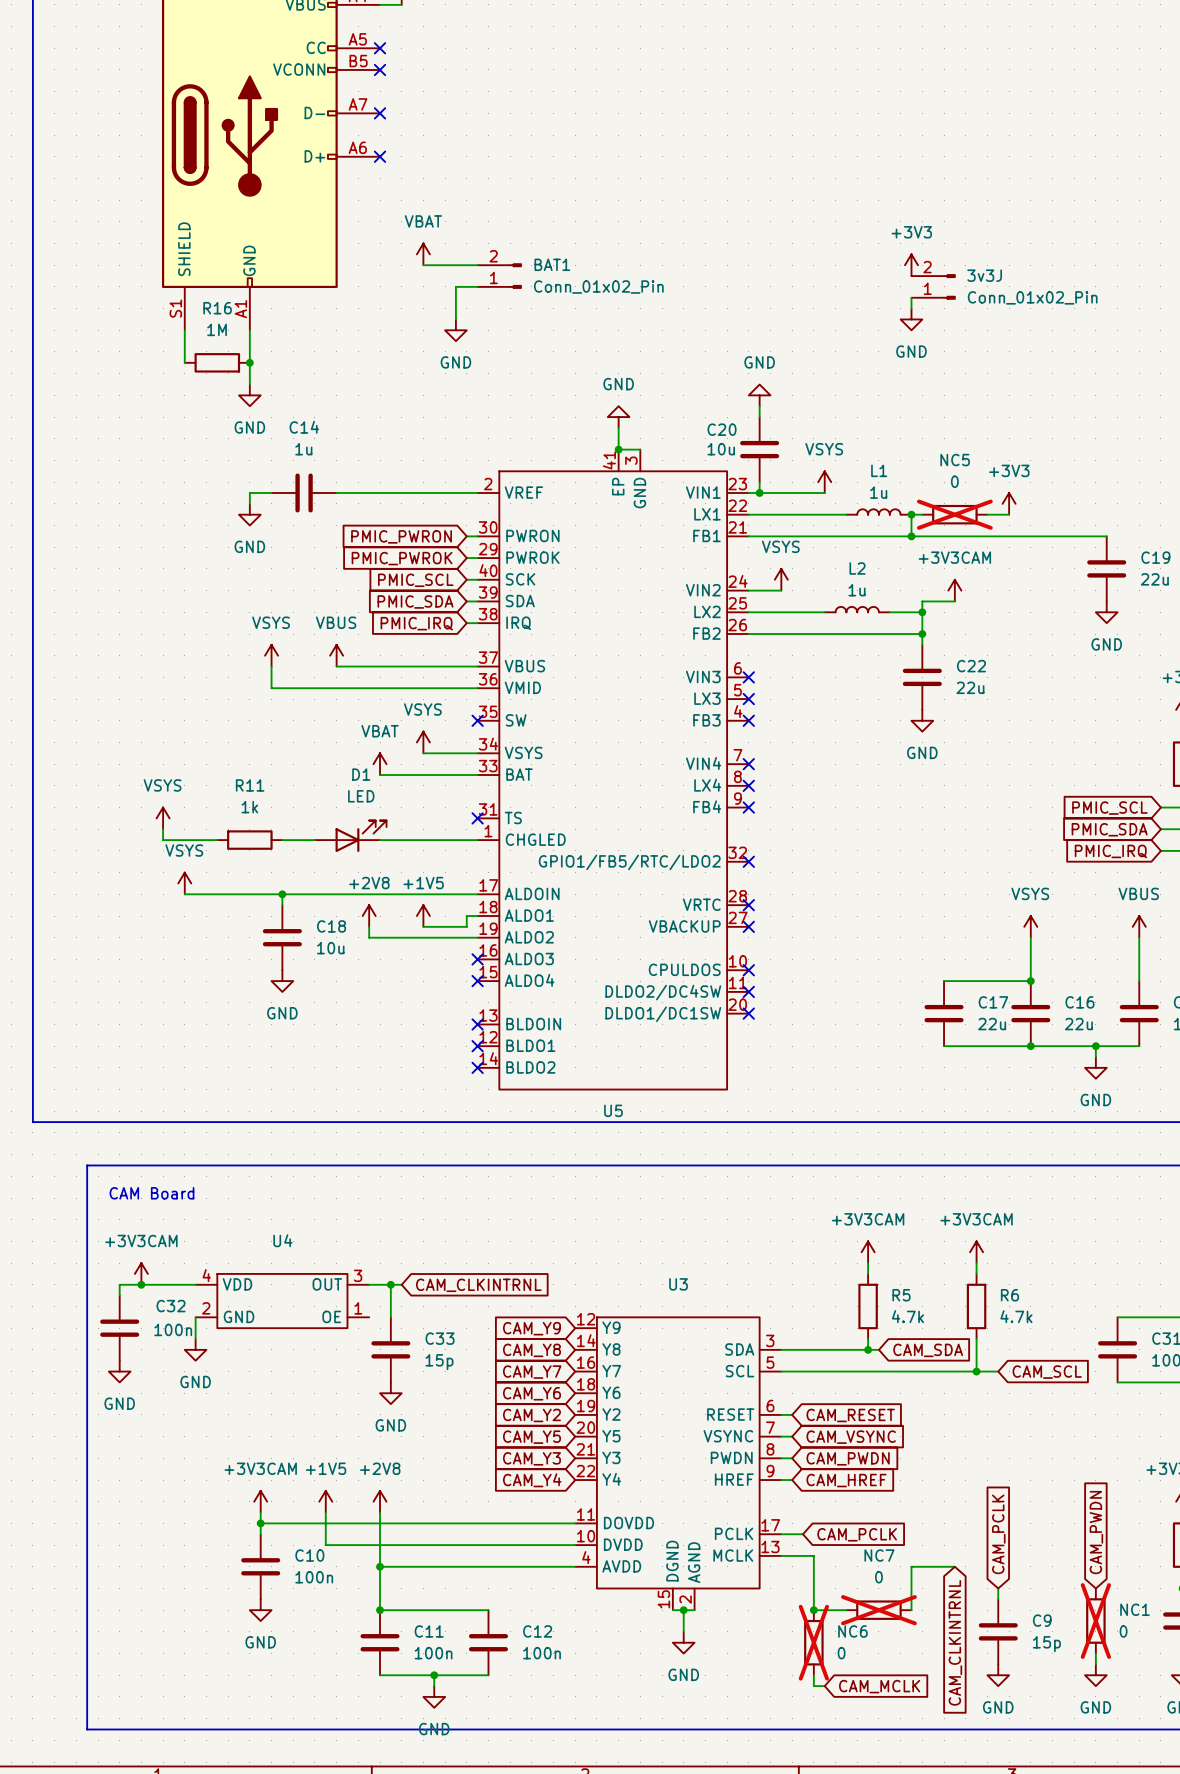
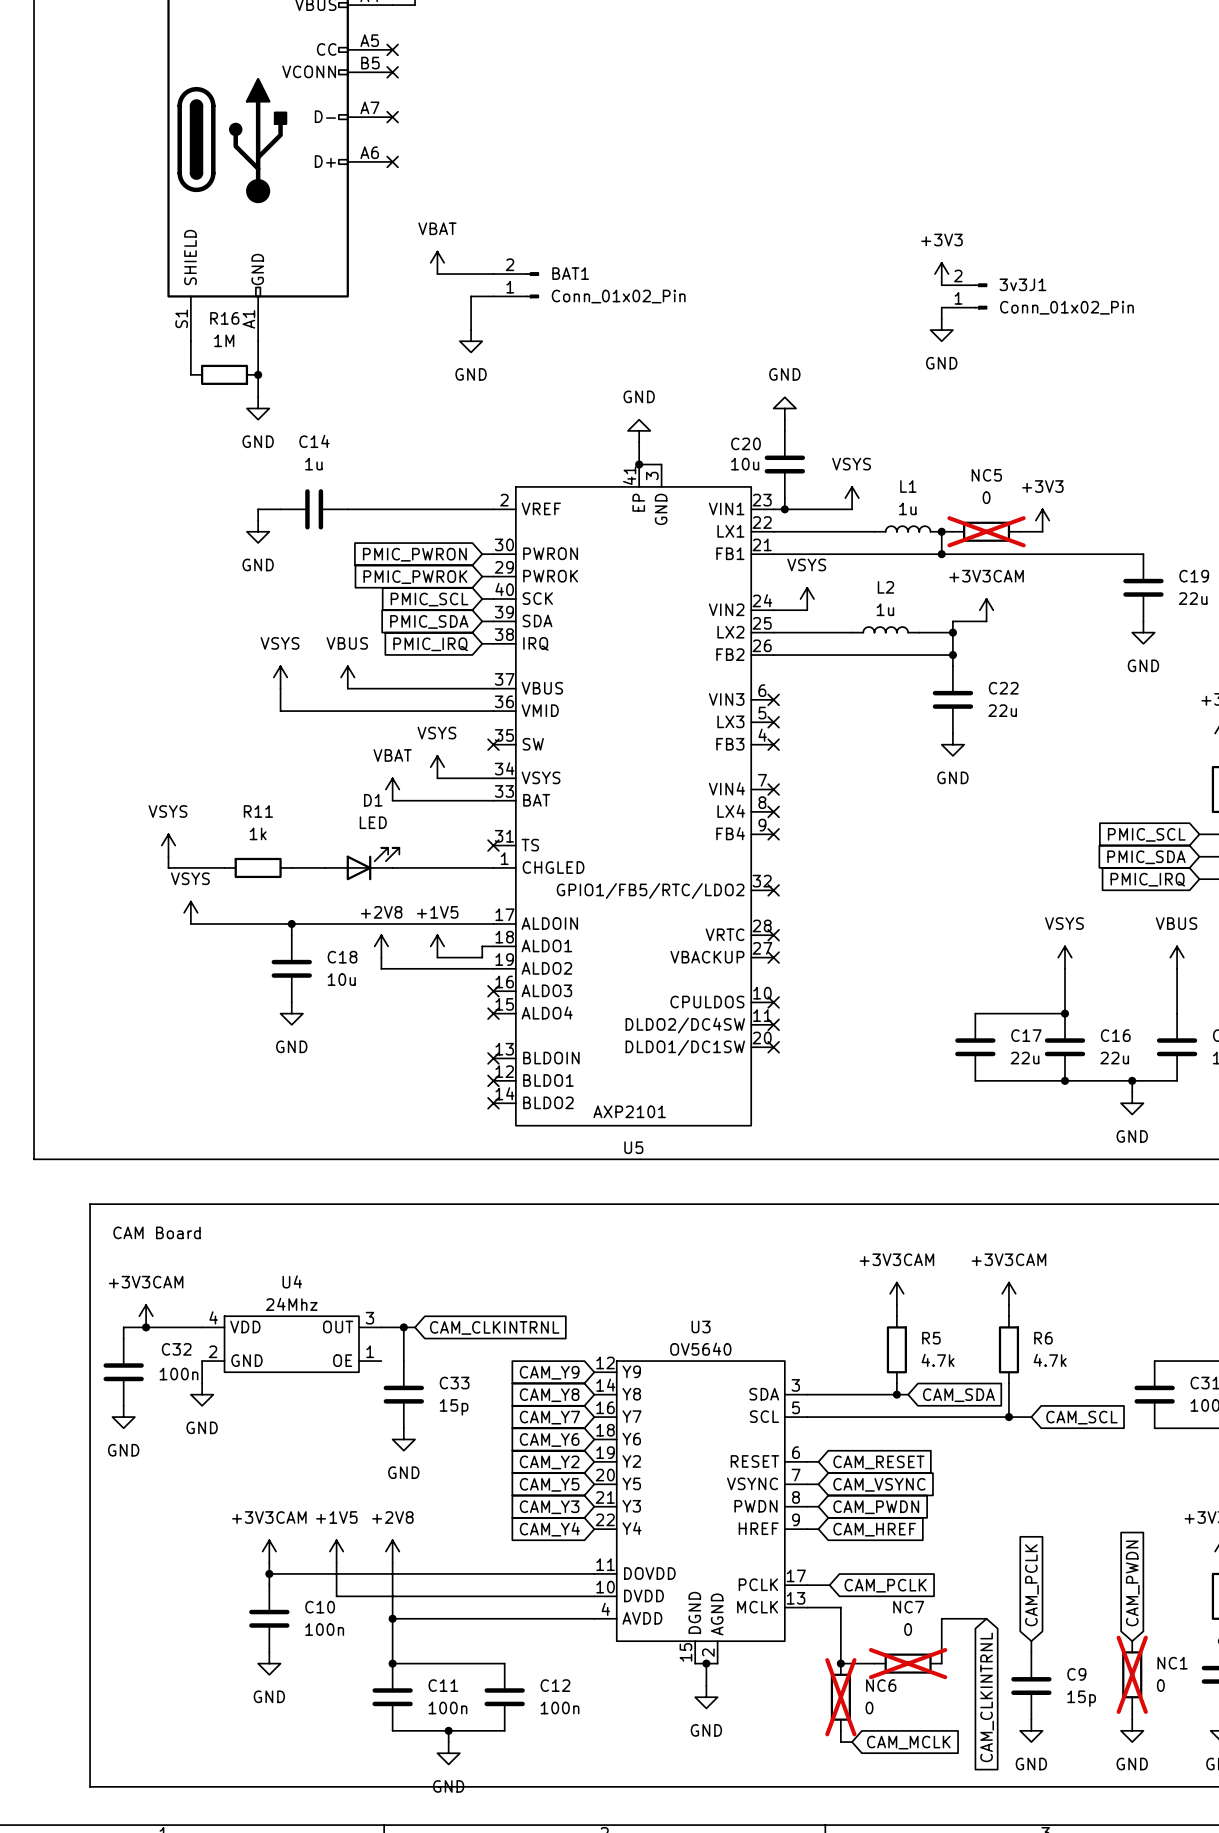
3v3J name: 3v3J (984, 275) -> 3v3J1 (1022, 284)
U5 value: none -> AXP2101 (629, 1111)
U4 value: none -> 24Mhz (291, 1304)
U3 value: none -> OV5640 (700, 1349)

